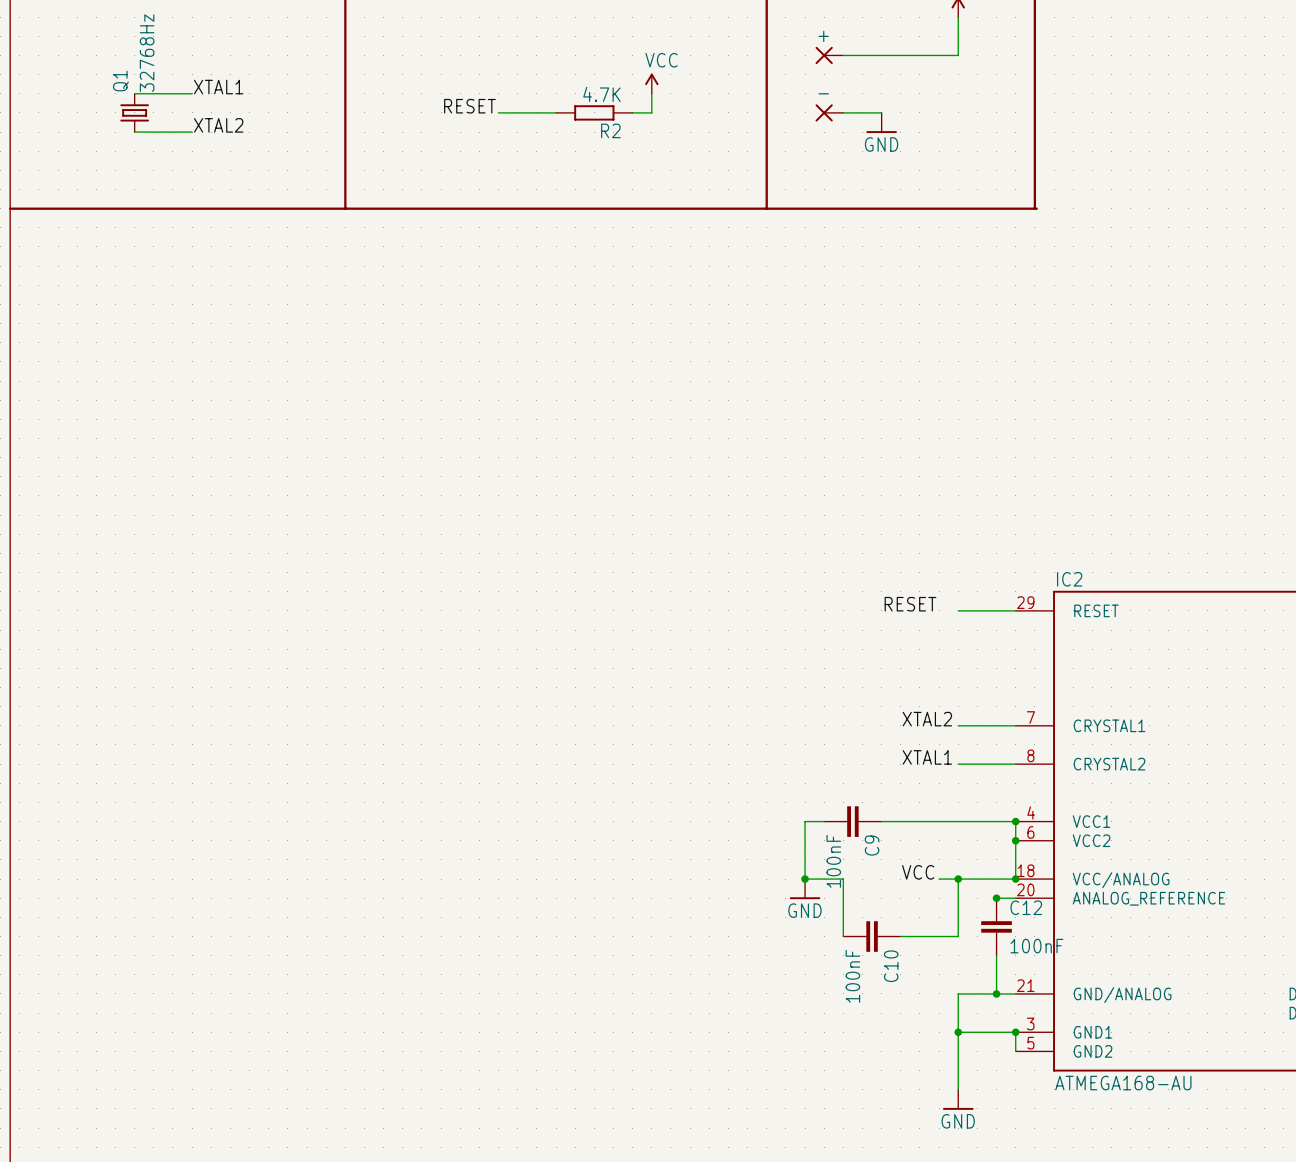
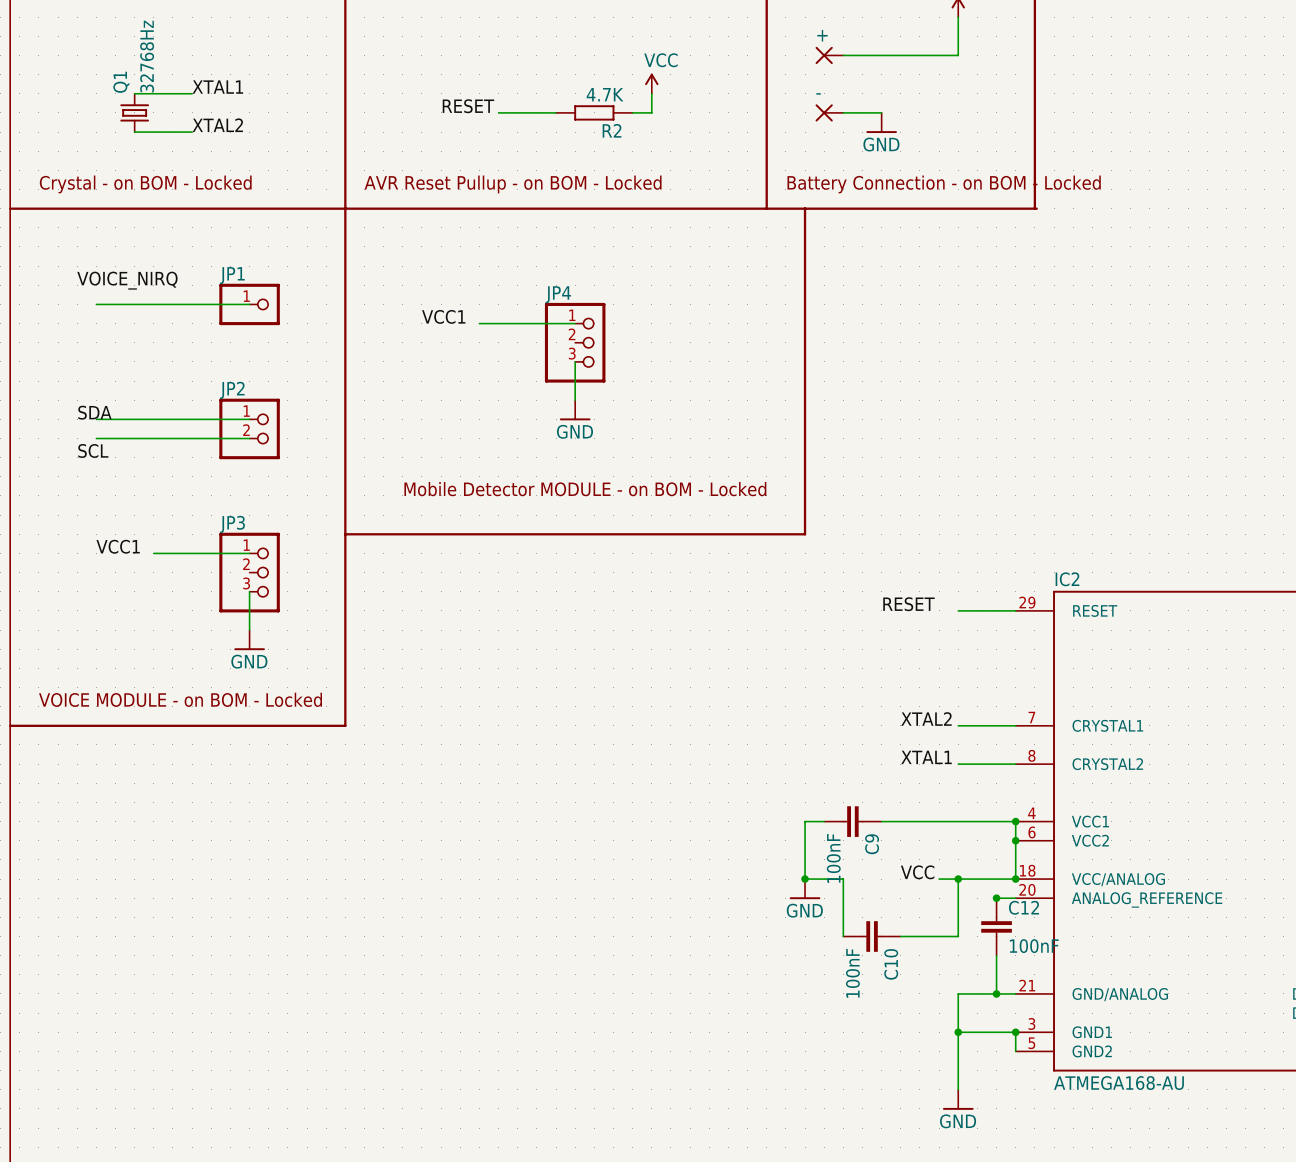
text: none -> Crystal - on BOM - Locked (145, 184)
text: none -> AVR Reset Pullup - on BOM - Locked (513, 184)
text: none -> Battery Connection - on BOM - Locked (944, 184)
line: none -> (345, 208) (345, 725) (10, 725)
line: none -> (805, 208) (805, 534) (345, 534)
label: none -> VOICE_NIRQ (127, 280)
wire: none -> (96, 304) (249, 304)
JP1: none -> (249, 304)
label: none -> VCC1 (443, 316)
wire: none -> (479, 323) (575, 323)
JP4: none -> (575, 342)
wire: none -> (575, 361) (575, 400)
power symbol: none -> GND (575, 410)
label: none -> SDA (94, 412)
wire: none -> (96, 419) (249, 419)
JP2: none -> (249, 428)
wire: none -> (96, 438) (249, 438)
label: none -> SCL (93, 450)
text: none -> Mobile Detector MODULE - on BOM - Locked (585, 489)
label: none -> VCC1 (118, 546)
wire: none -> (153, 553) (249, 553)
JP3: none -> (249, 572)
wire: none -> (249, 591) (249, 630)
power symbol: none -> GND (249, 640)
text: none -> VOICE MODULE - on BOM - Locked (180, 699)

